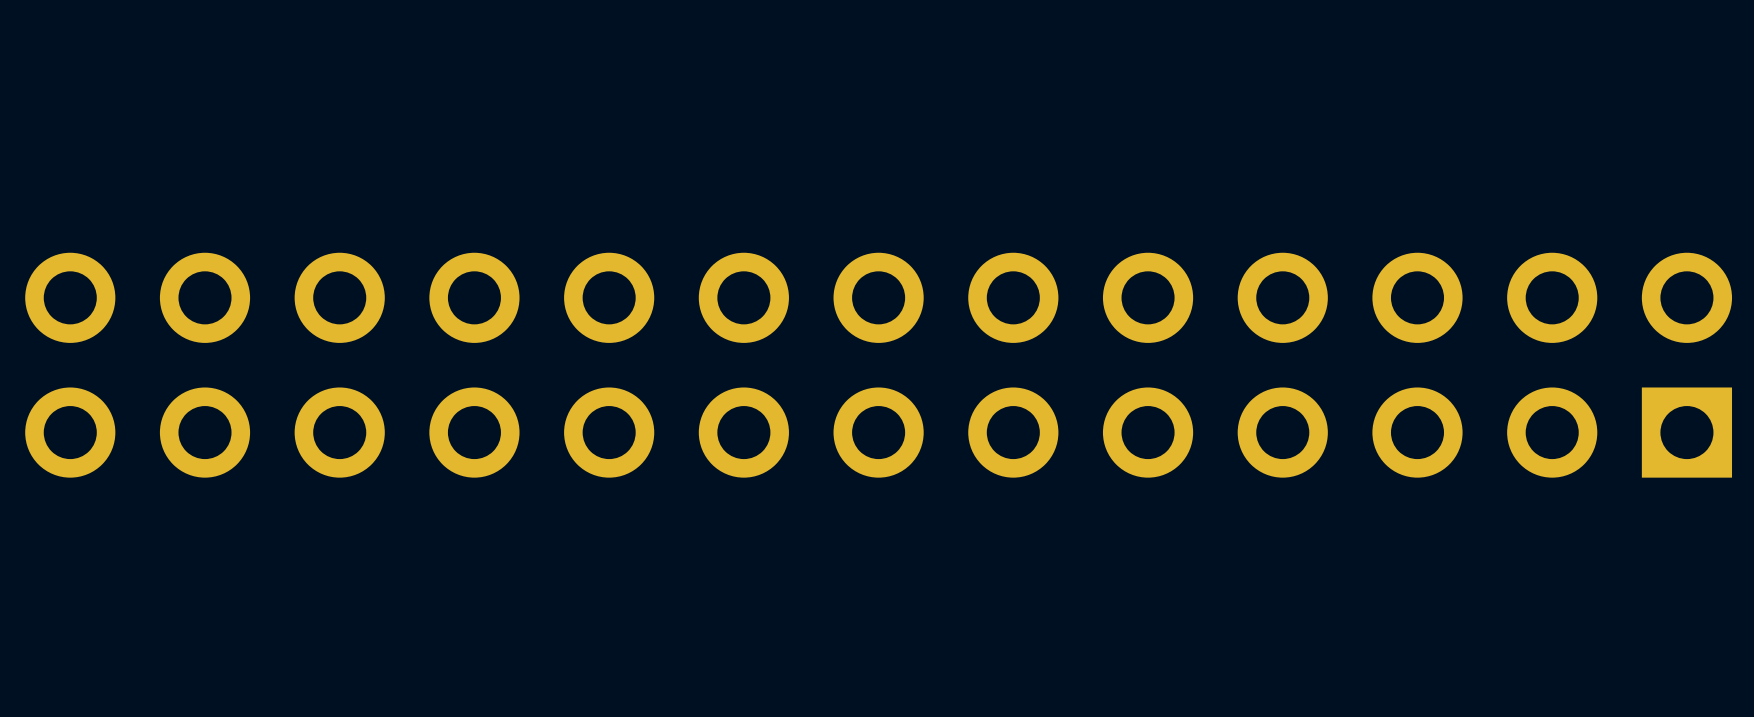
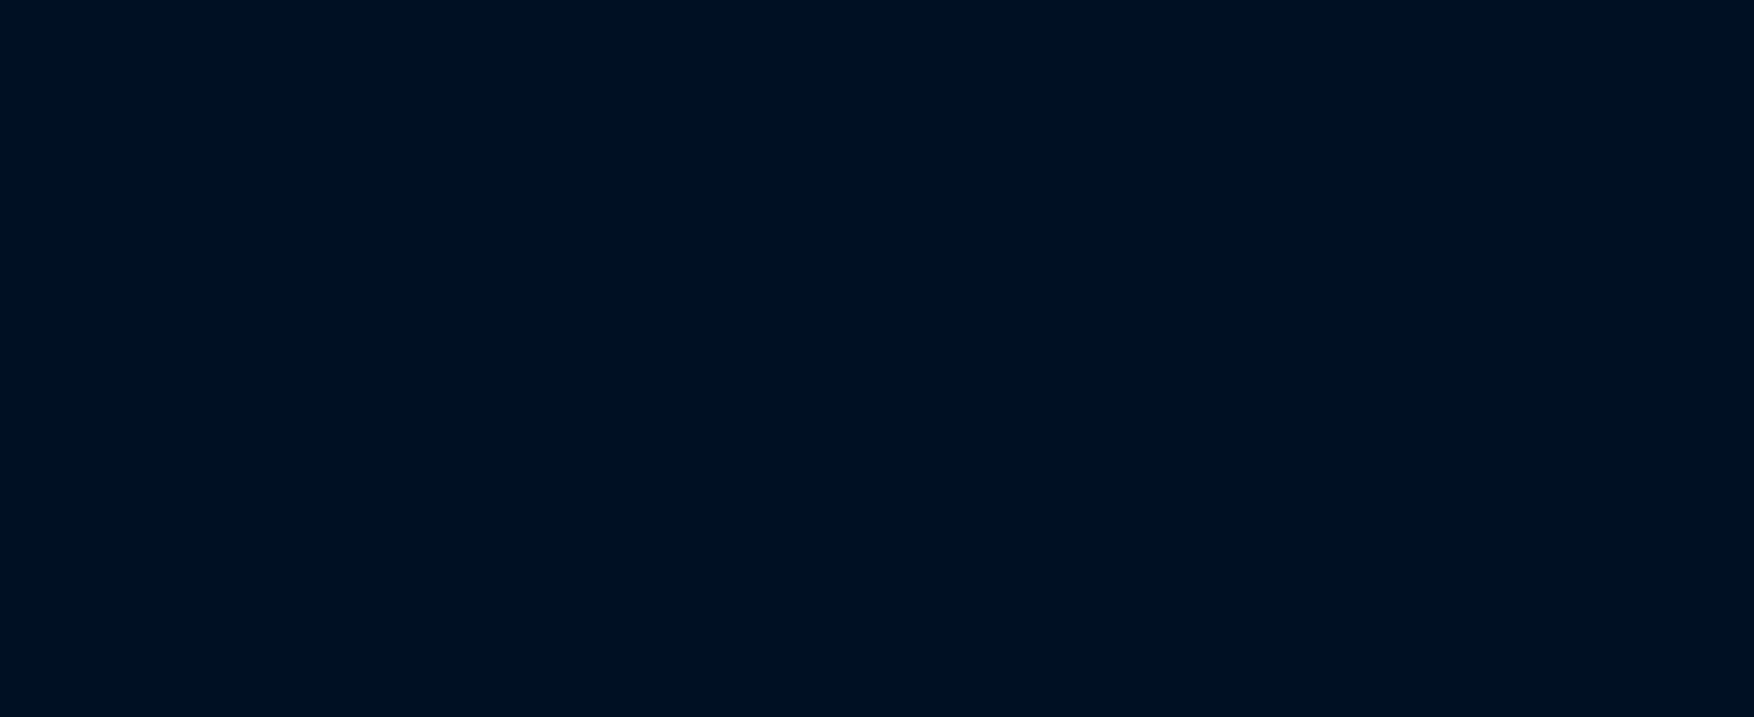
part: (878, 365) -> none

